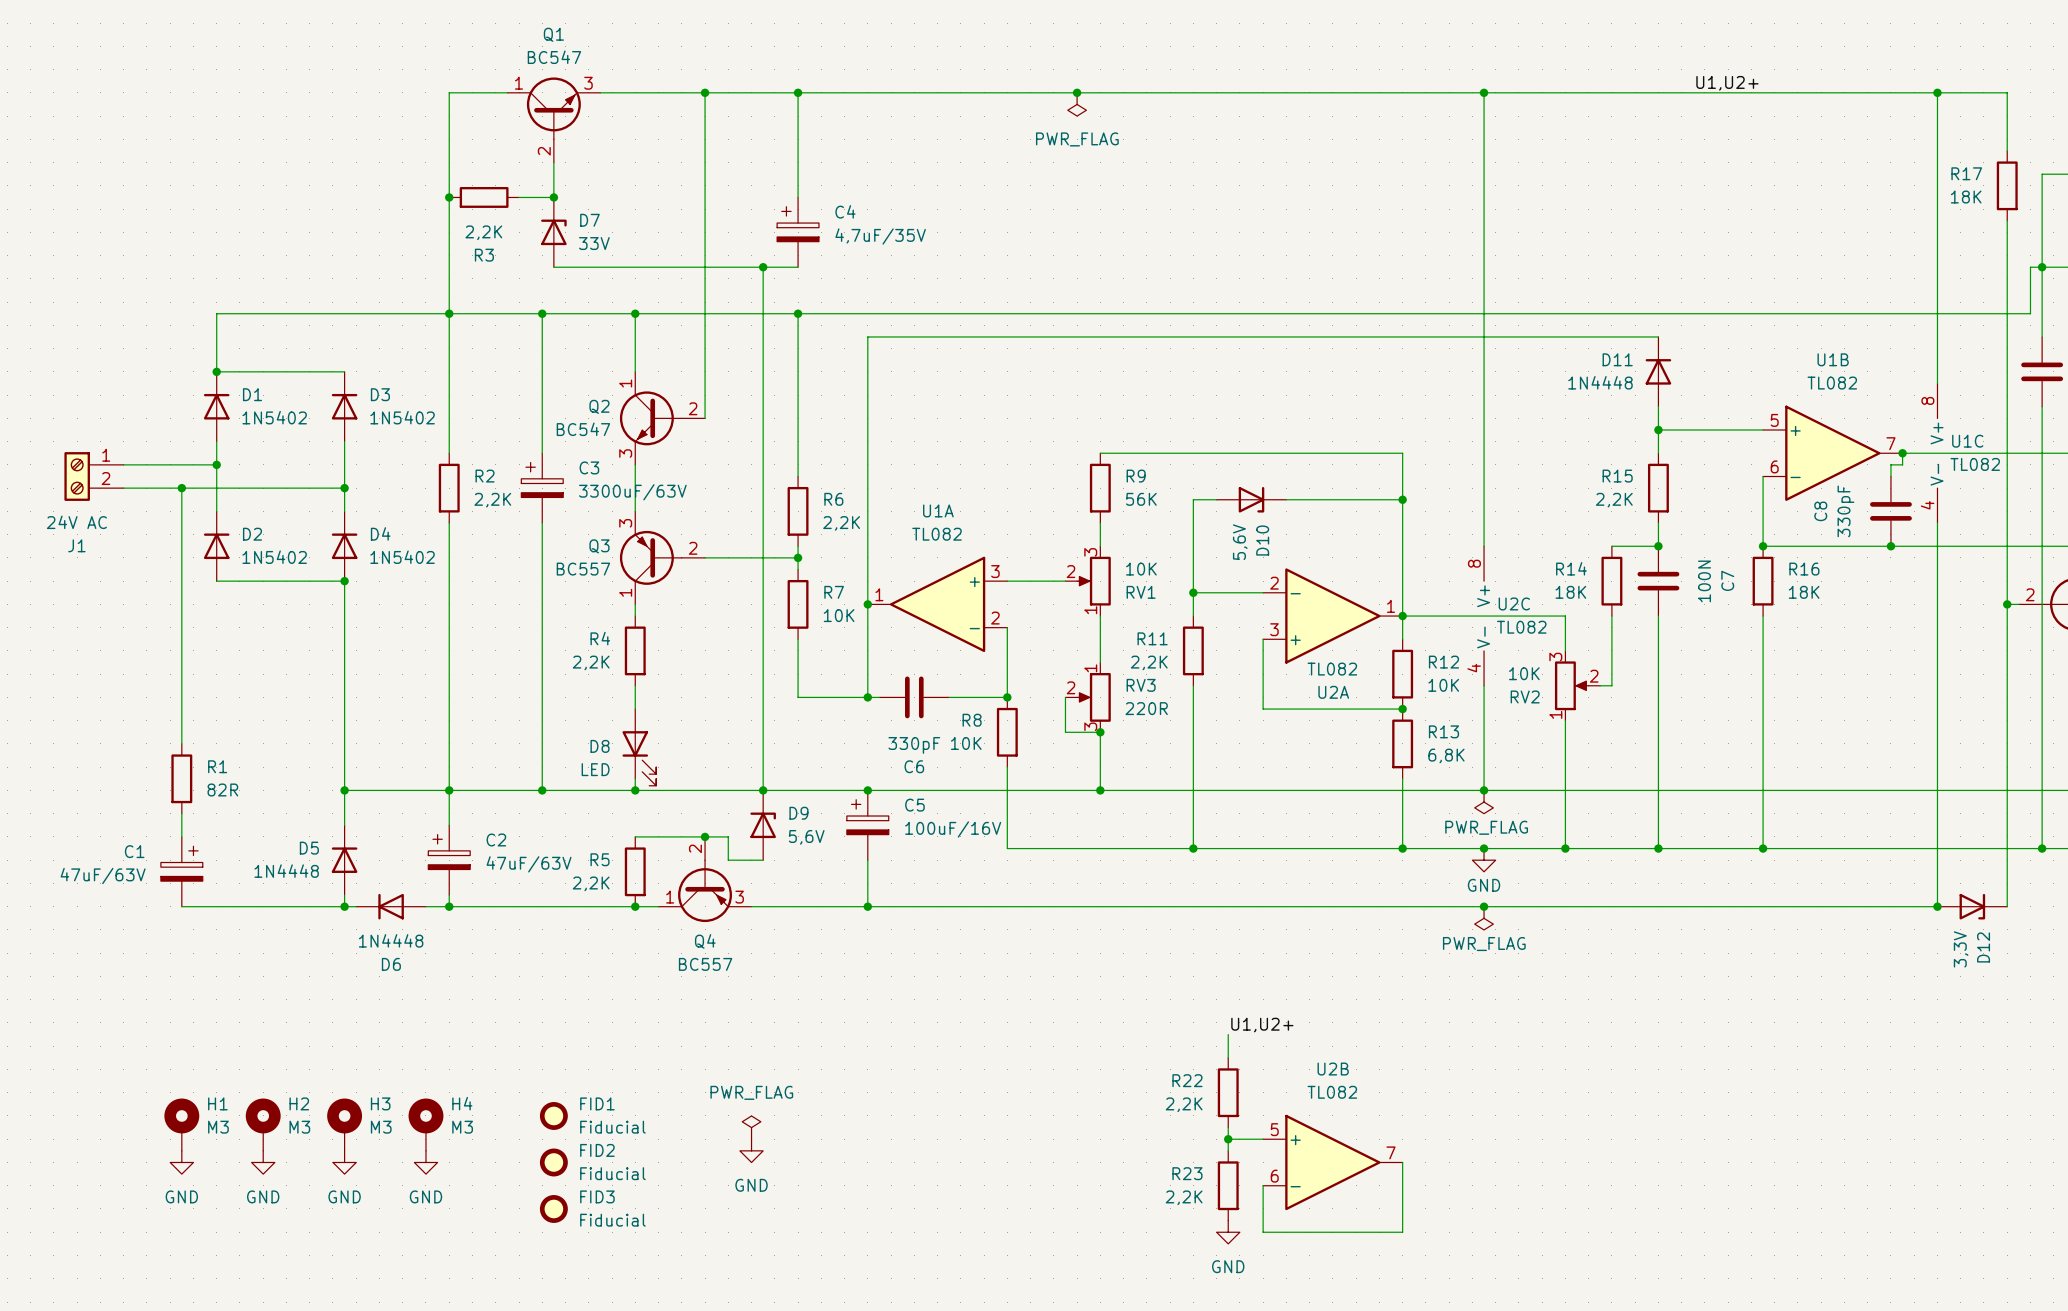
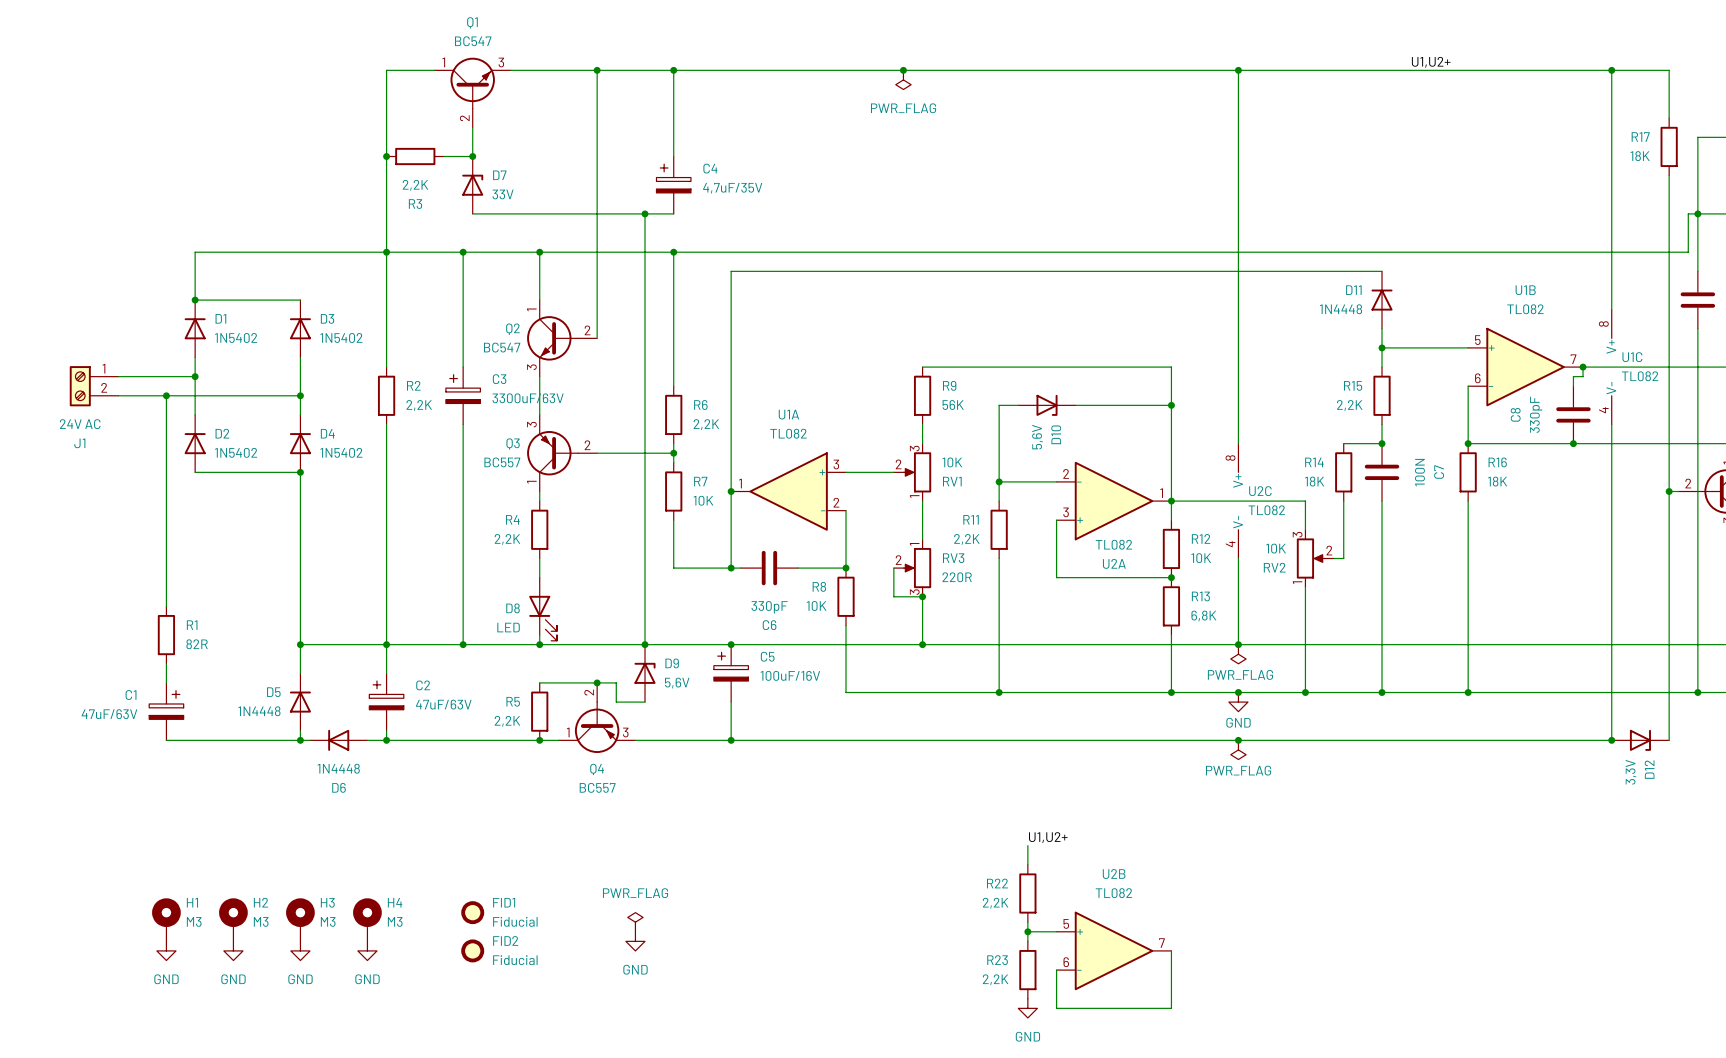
FID3: Fiducial (553, 1208) -> none

